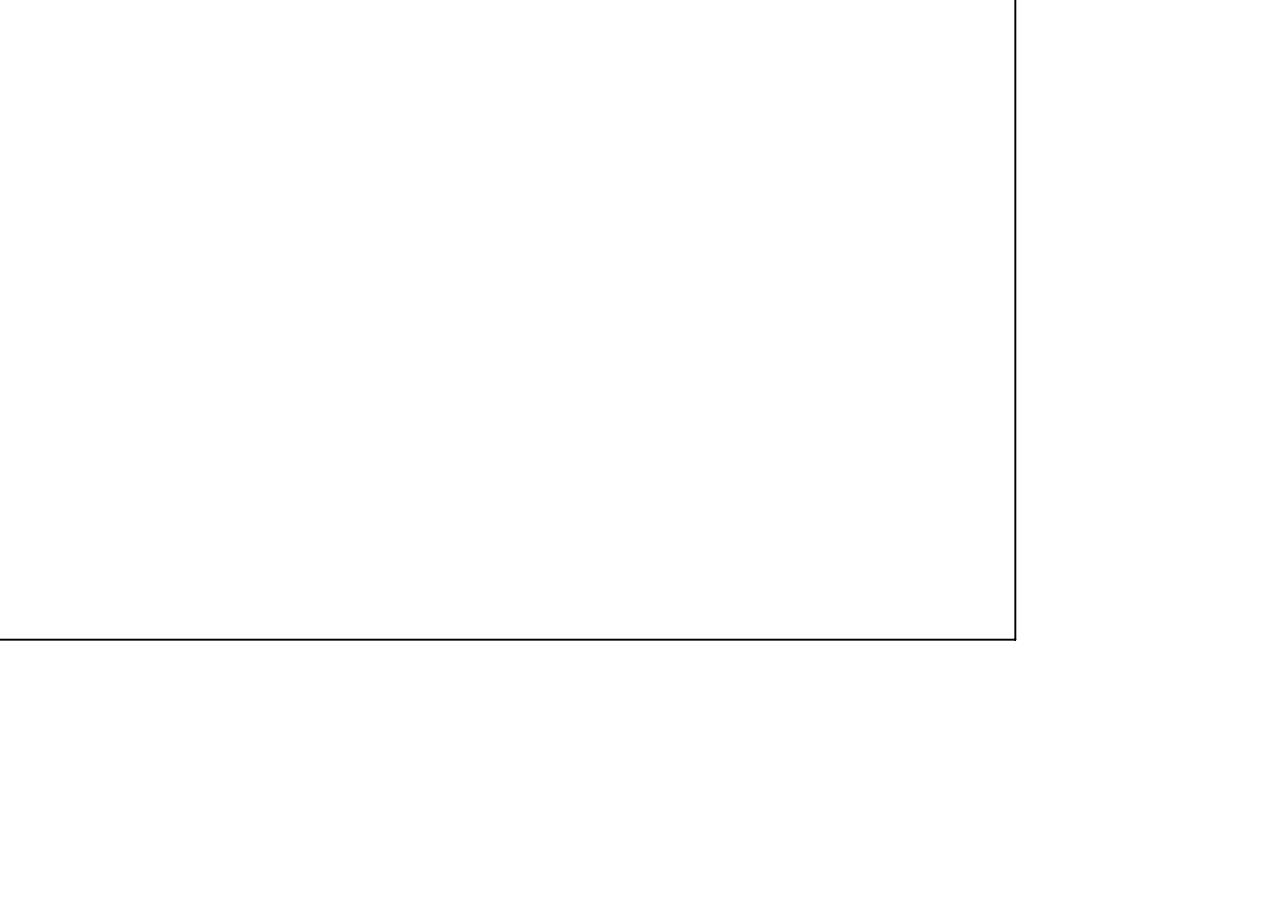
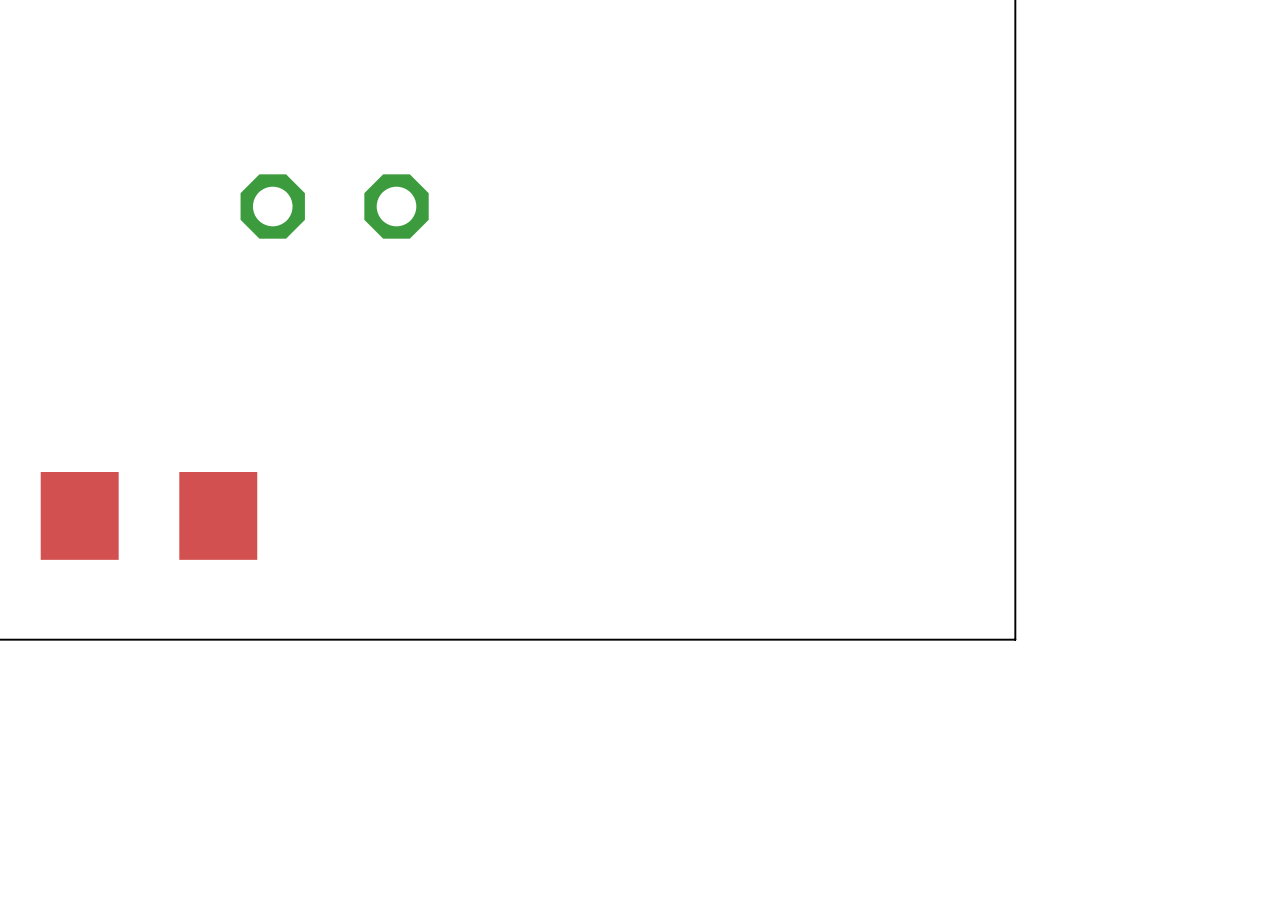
part: none -> (334, 206)
part: none -> (148, 515)

